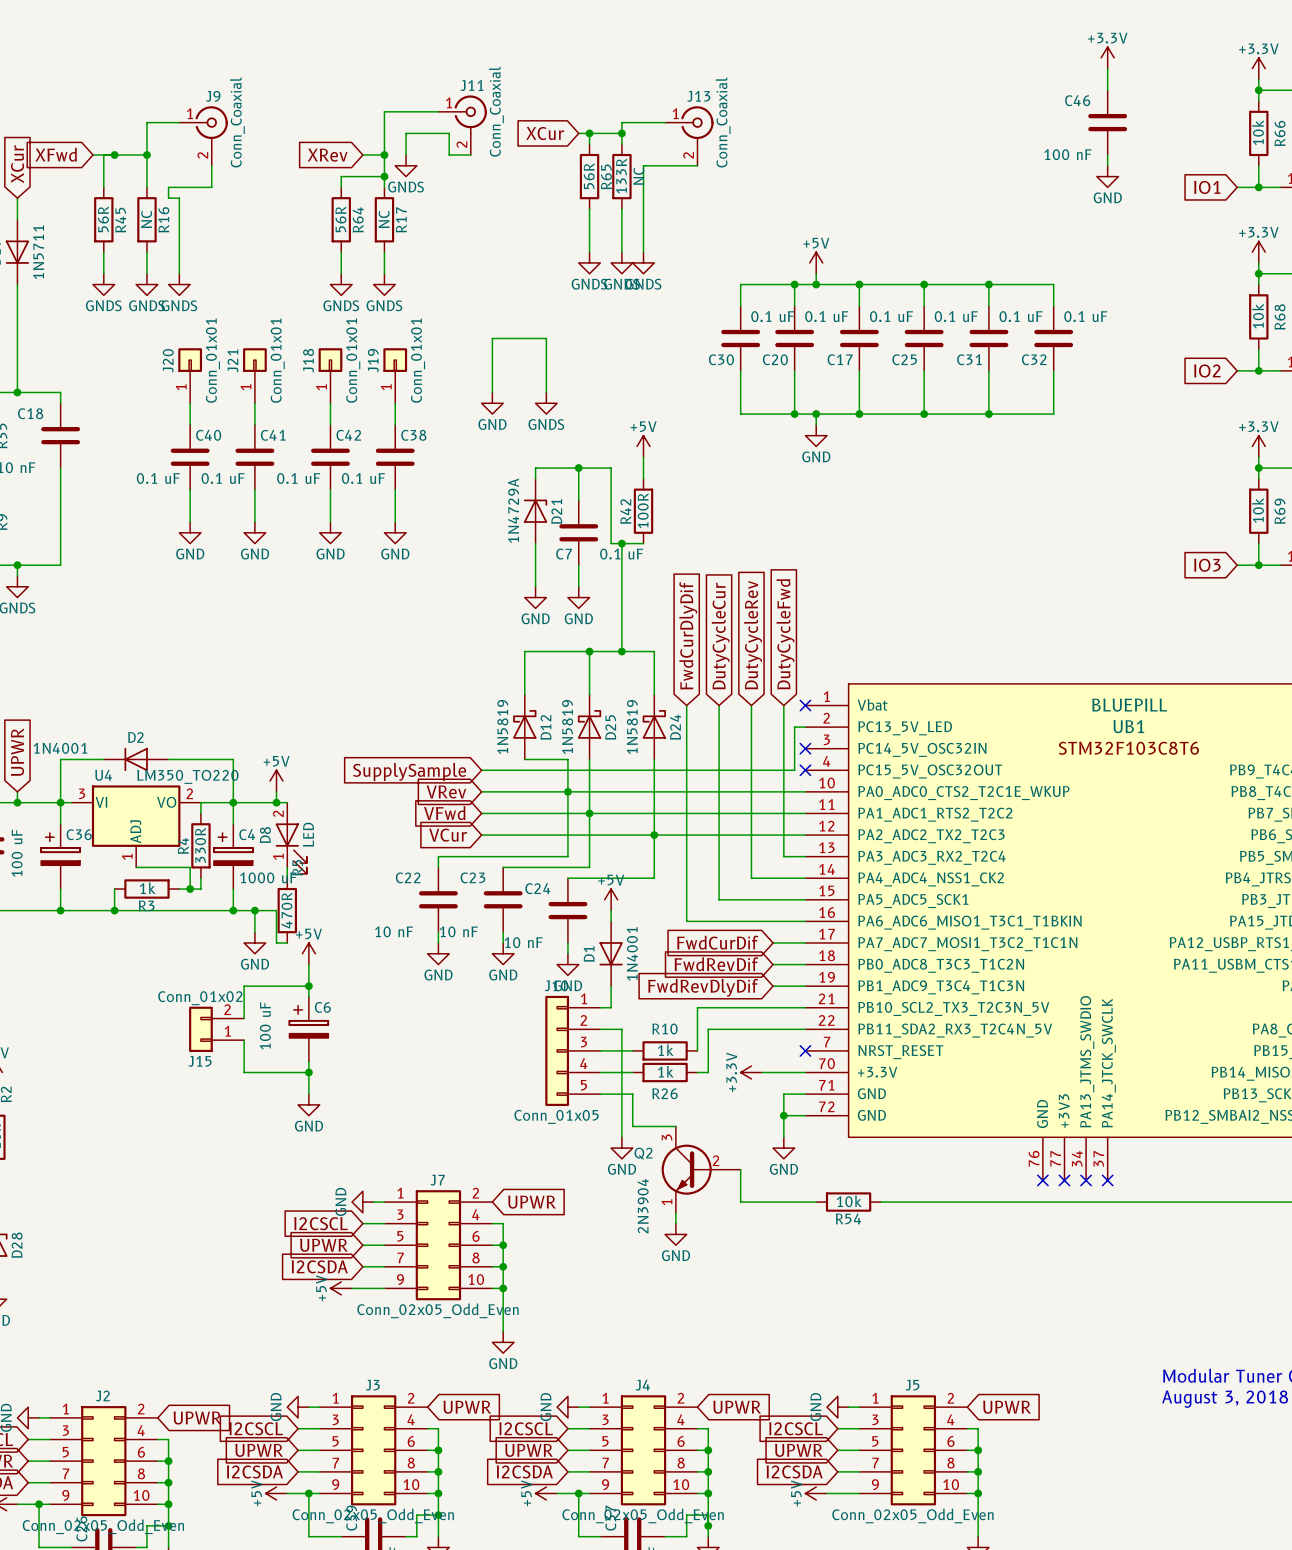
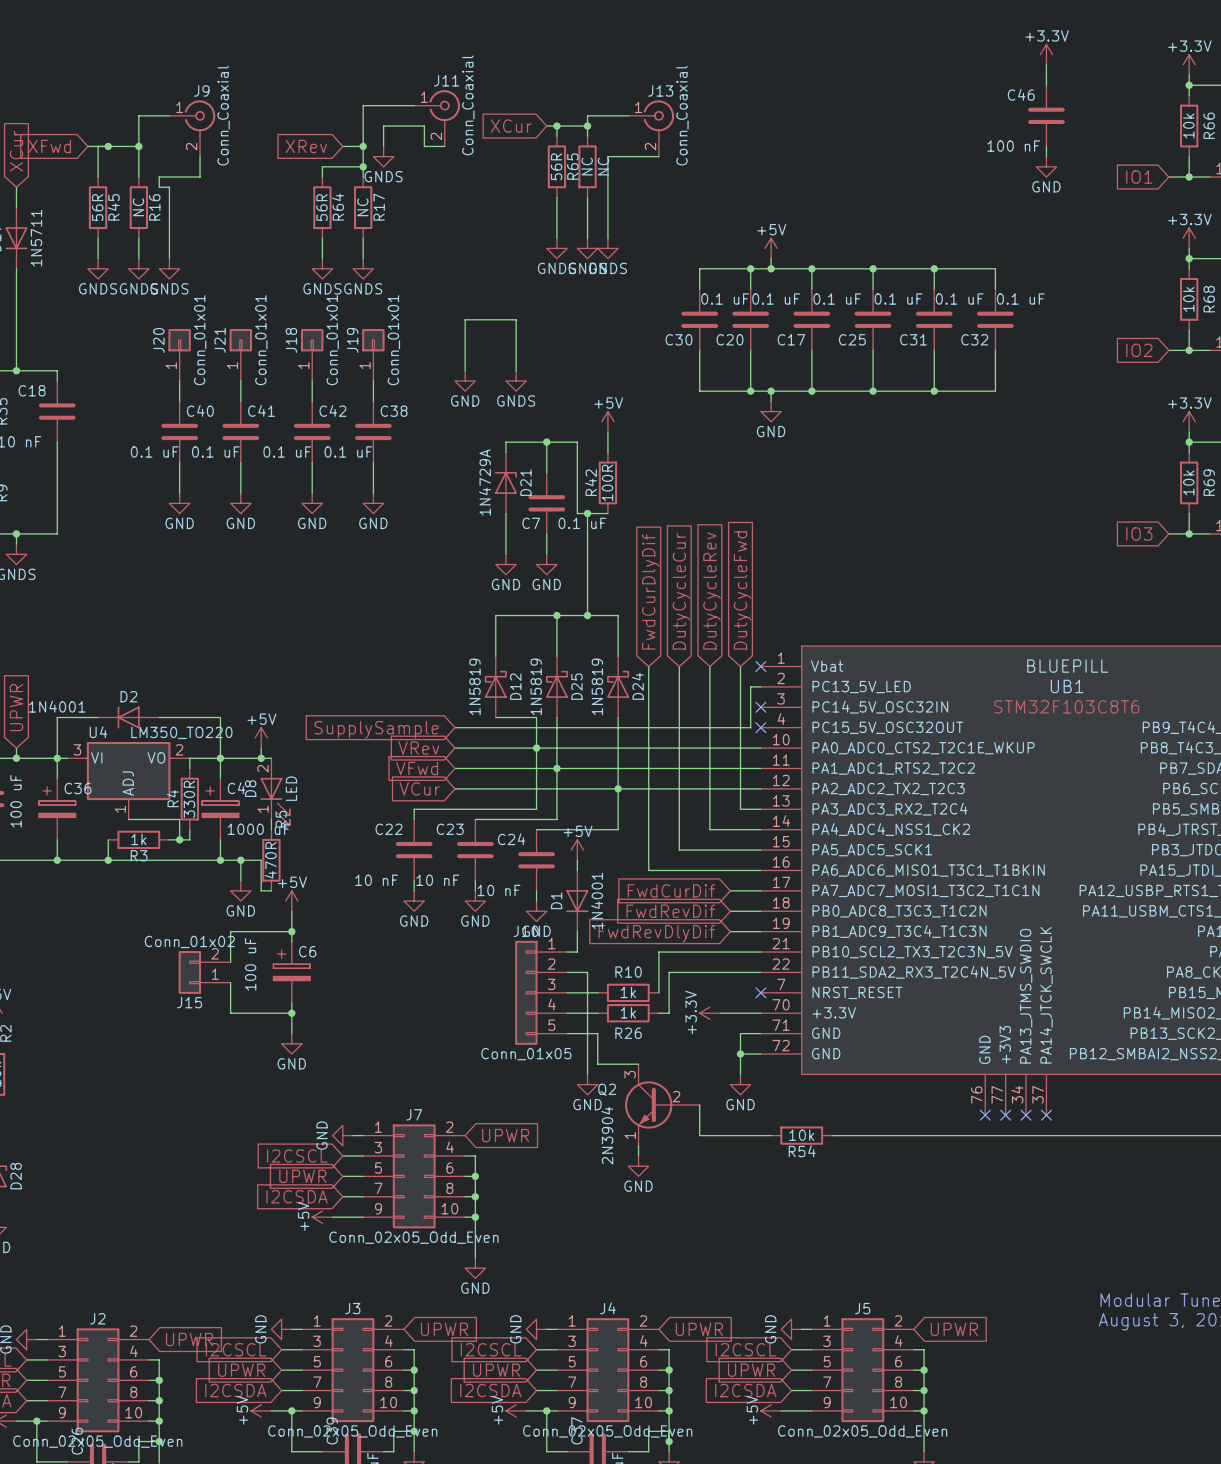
NC value: 133R (621, 176) -> NC (587, 166)

